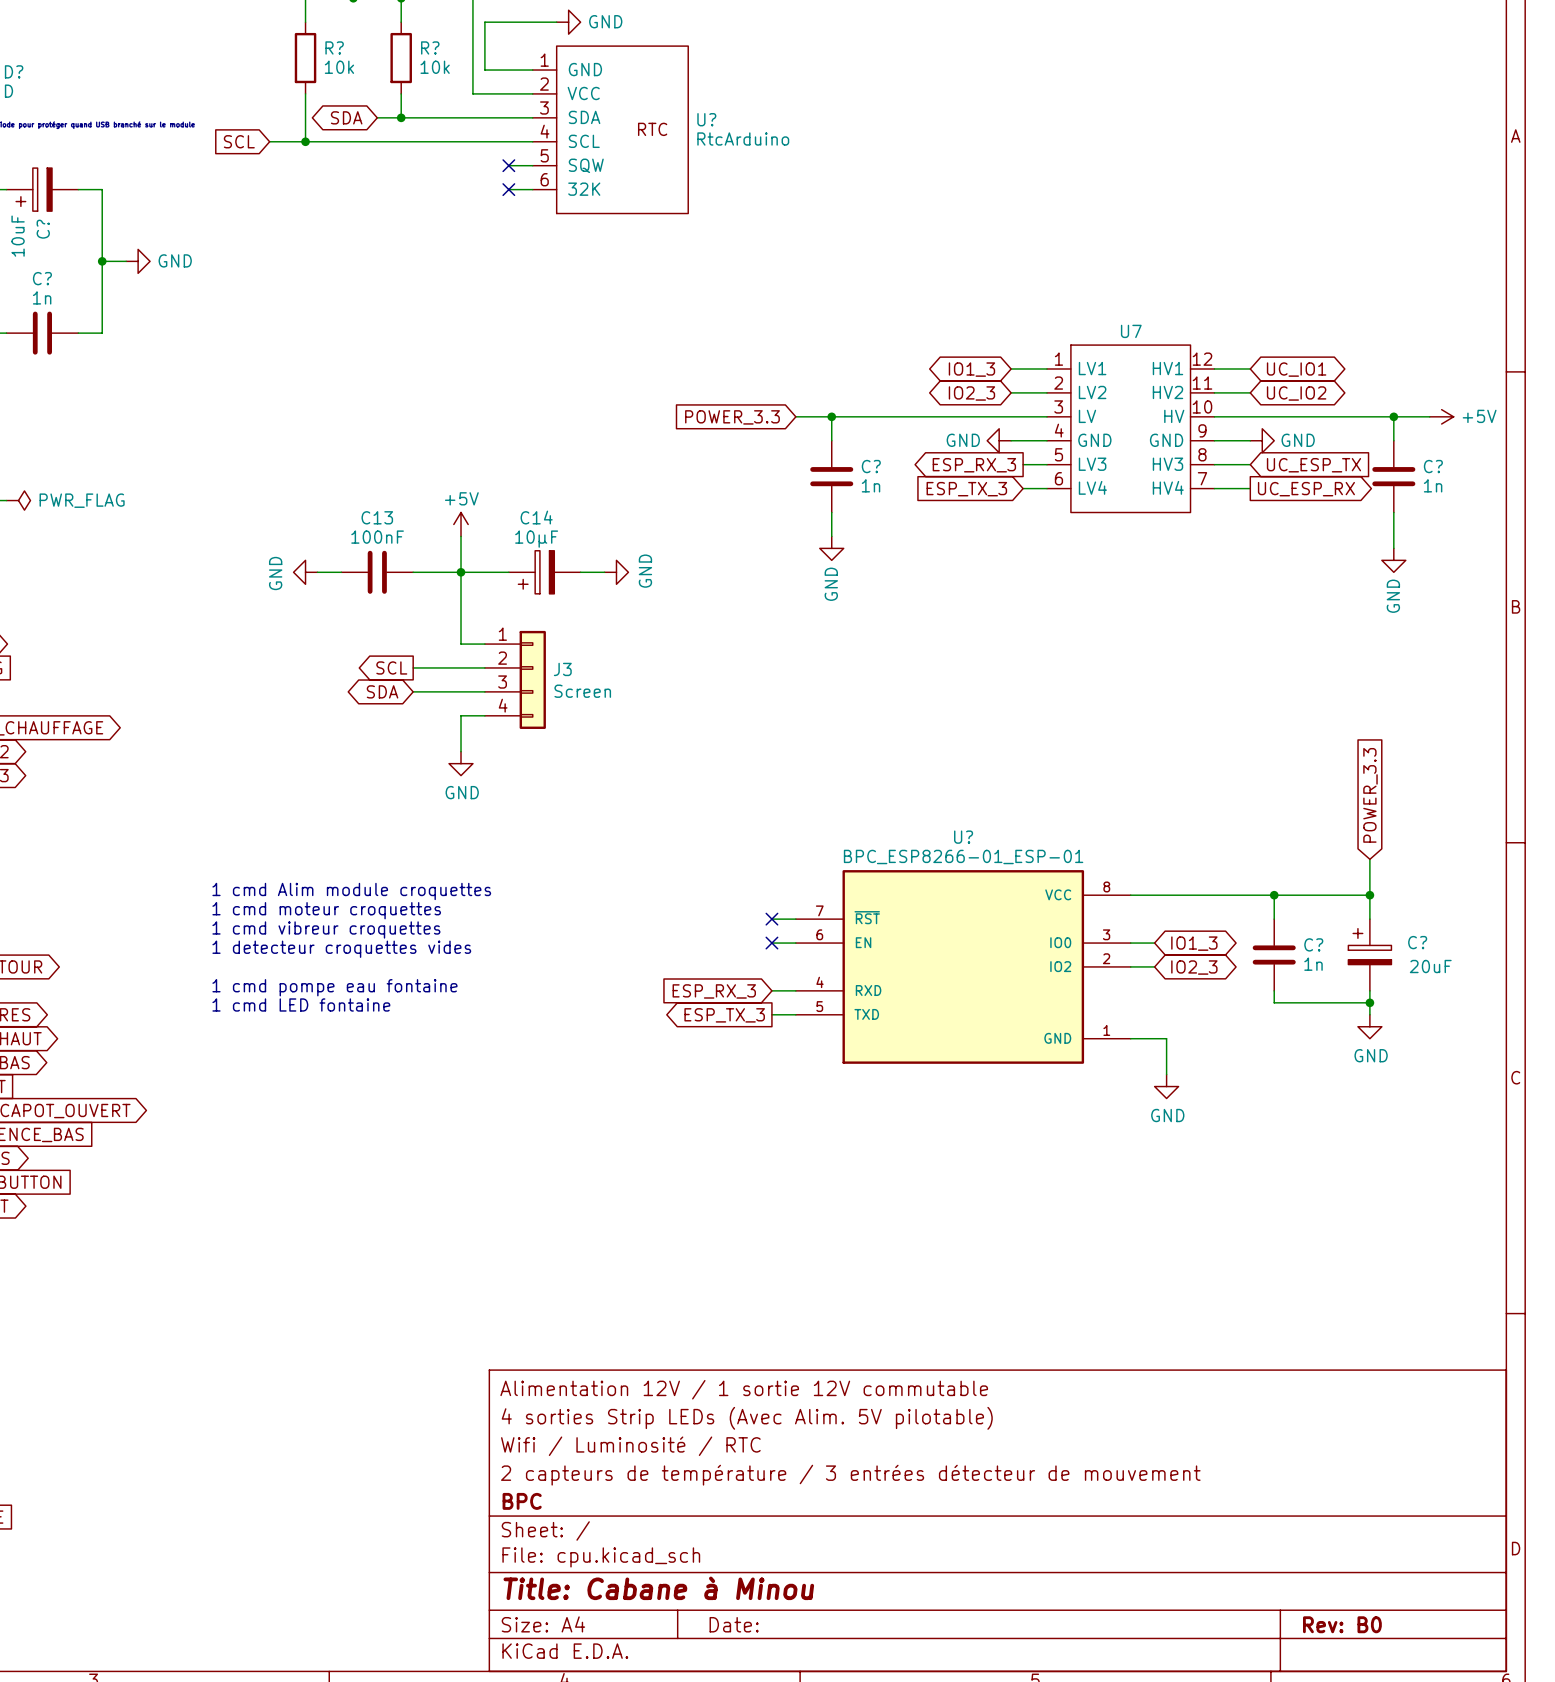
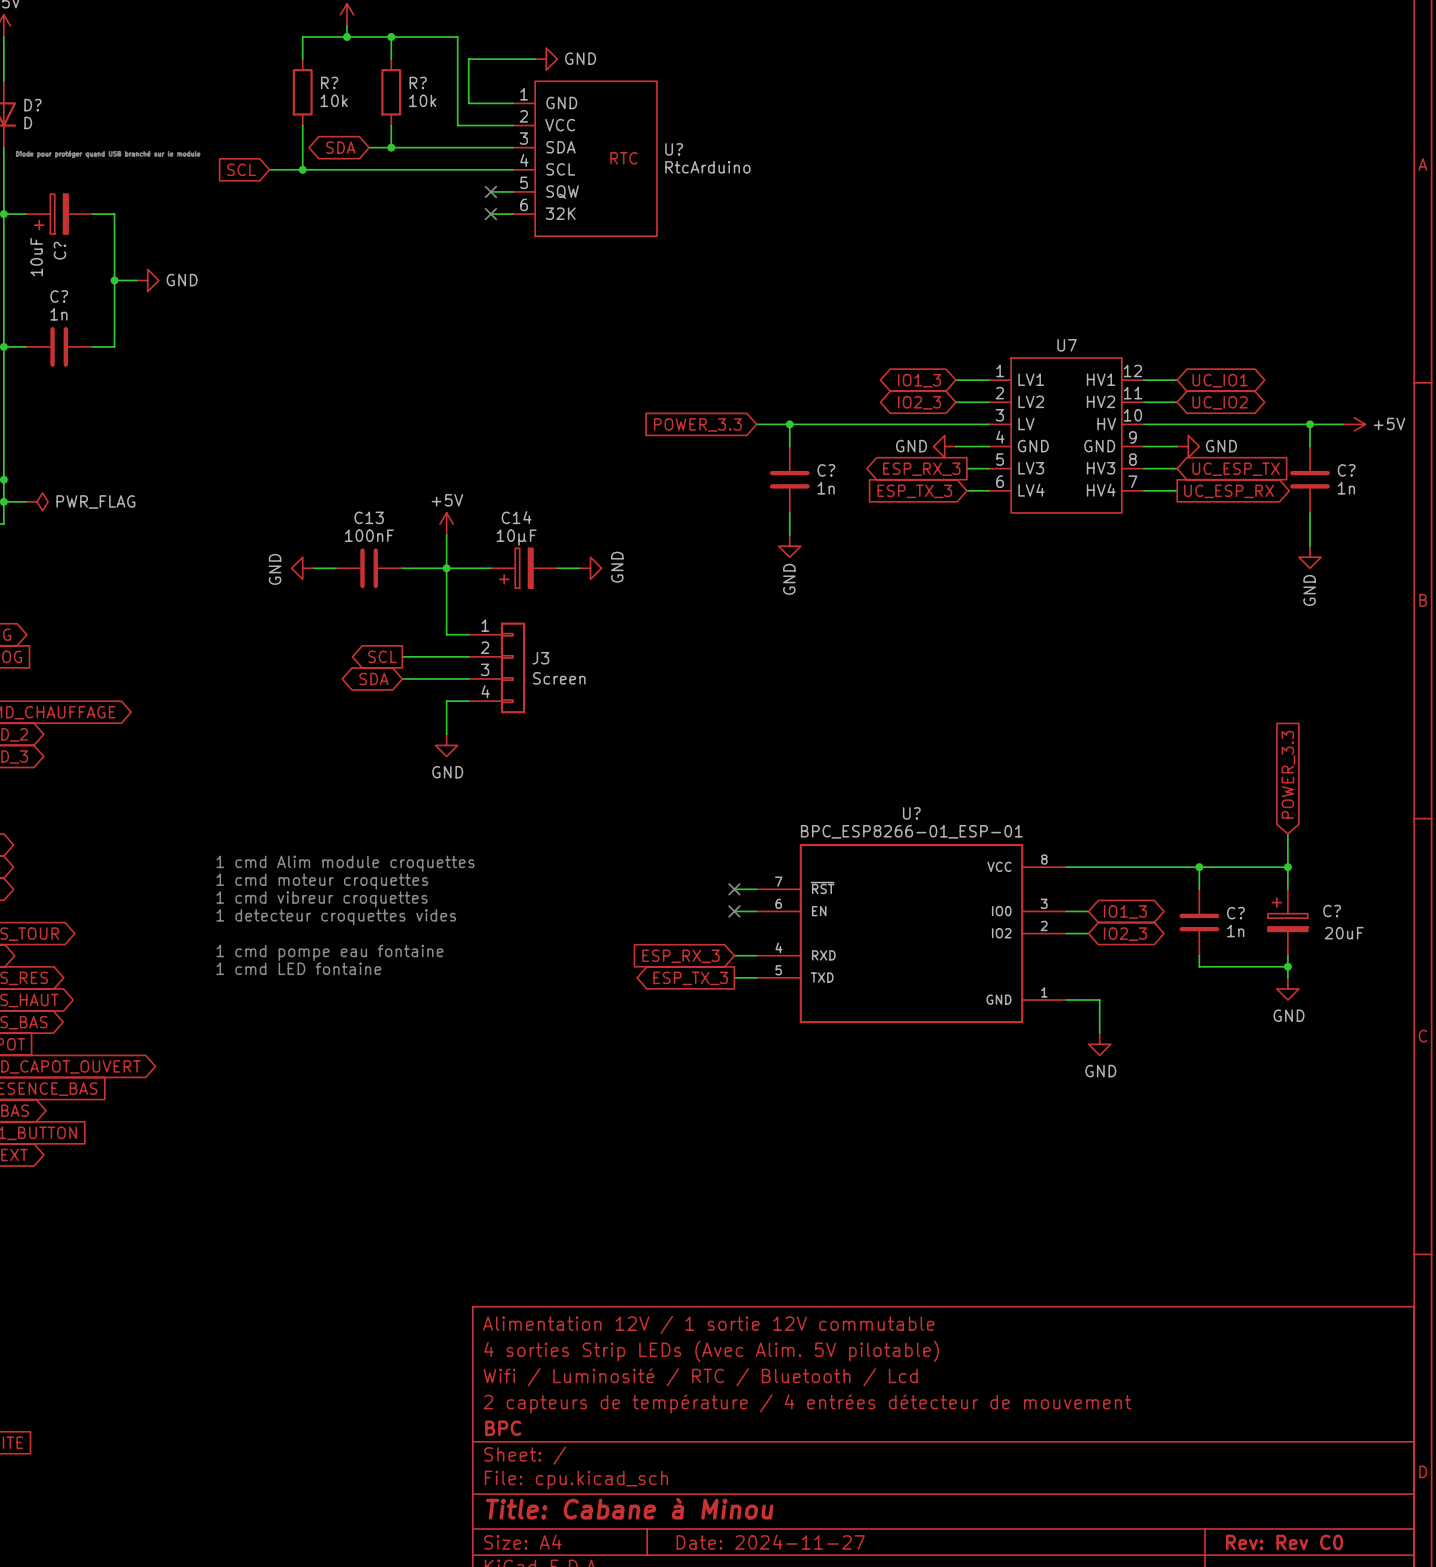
title block: Wifi / Luminosité / RTC (630, 1446) -> Wifi / Luminosité / RTC / Bluetooth / Lcd (700, 1377)
title block: 2 capteurs de température / 3 entrées détecteur de mouvement (850, 1475) -> 2 capteurs de température / 4 entrées détecteur de mouvement (807, 1403)
title block: Date: (734, 1624) -> Date: 2024-11-27 (770, 1542)
title block: Rev: B0 (1342, 1624) -> Rev: Rev C0 (1284, 1542)

